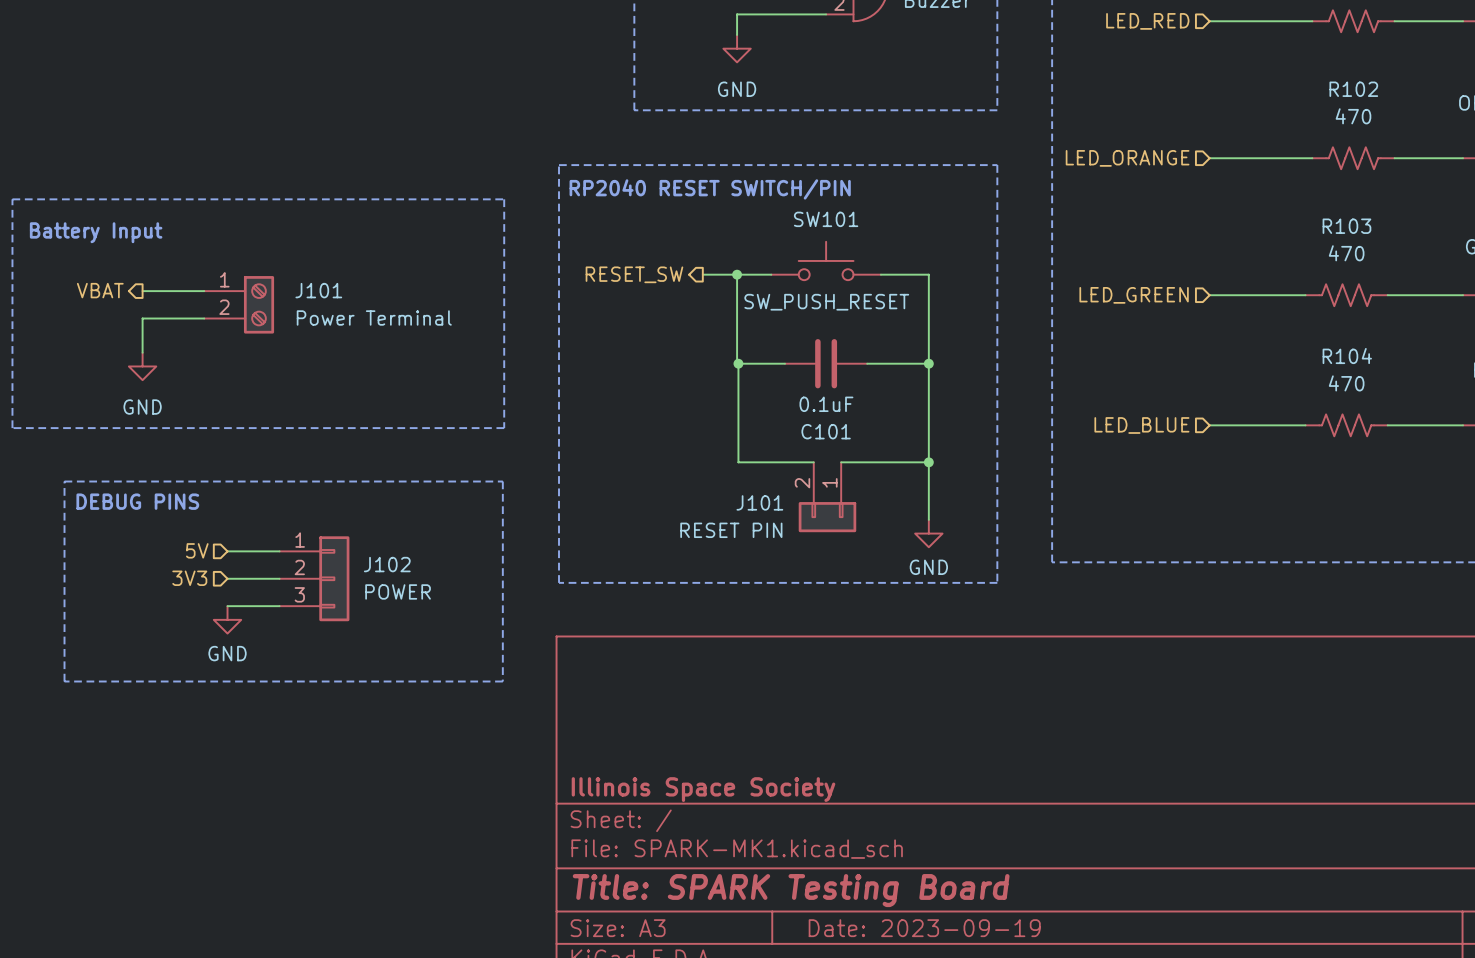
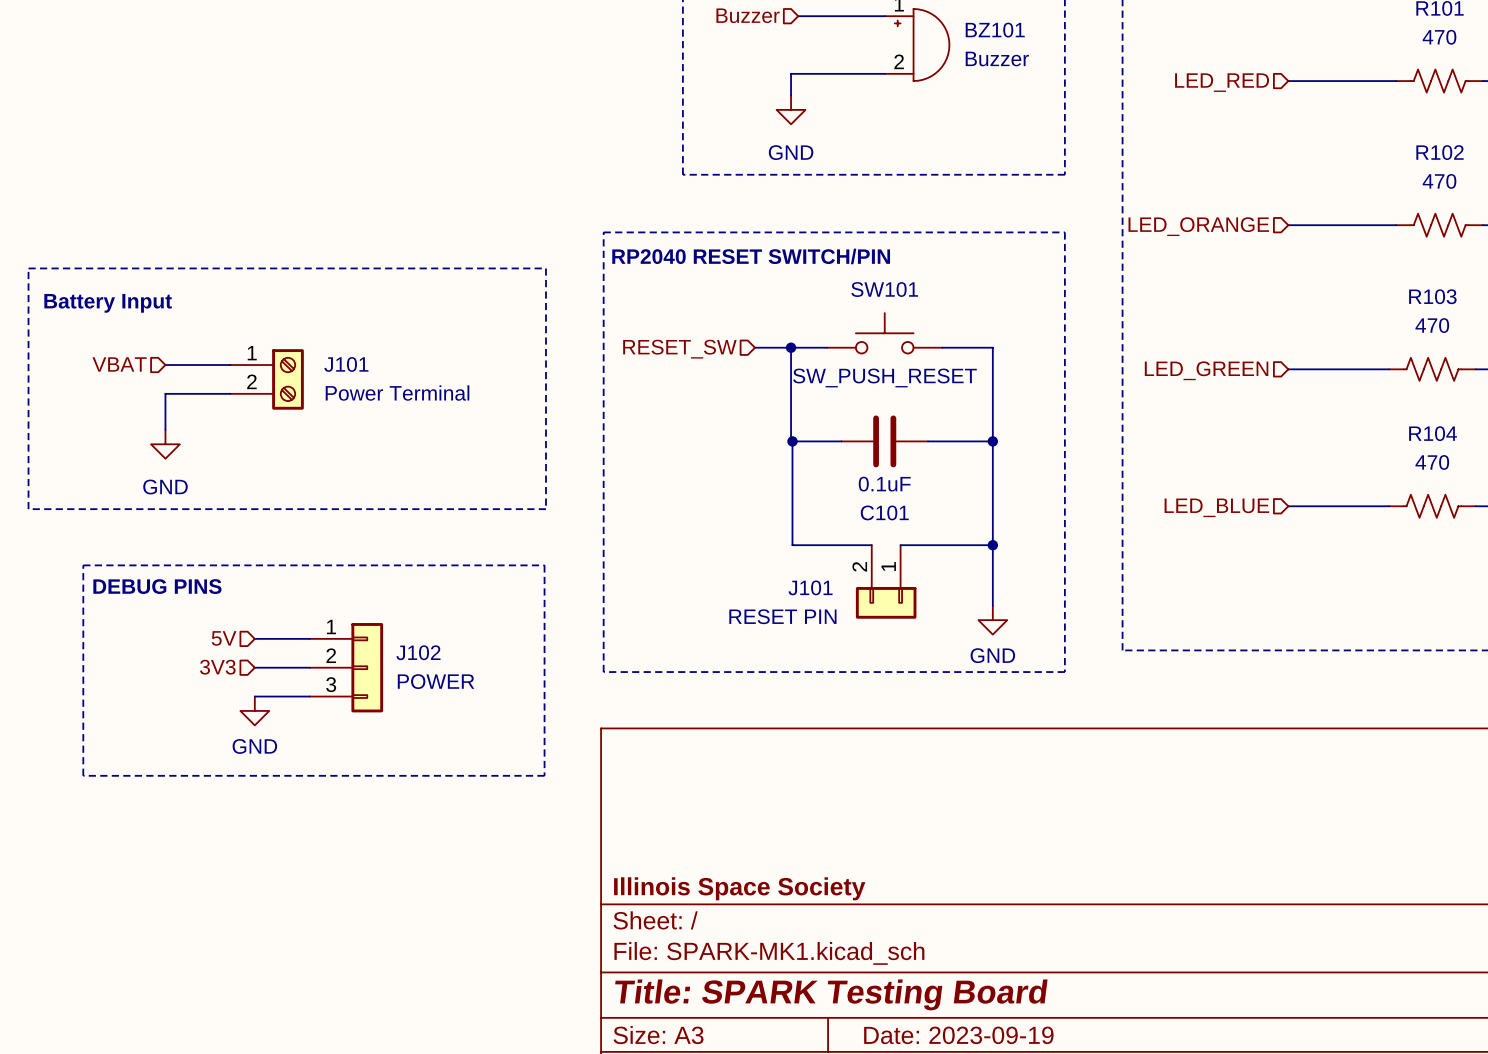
hierarchical label shape: output (634, 274) -> input (679, 349)
hierarchical label shape: output (100, 290) -> input (119, 364)

